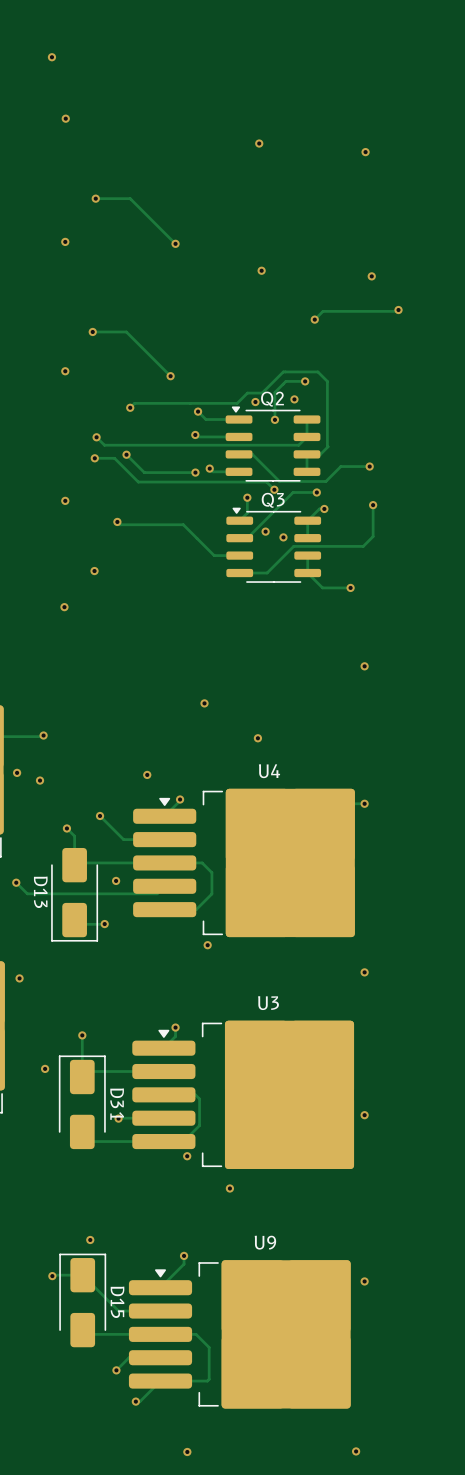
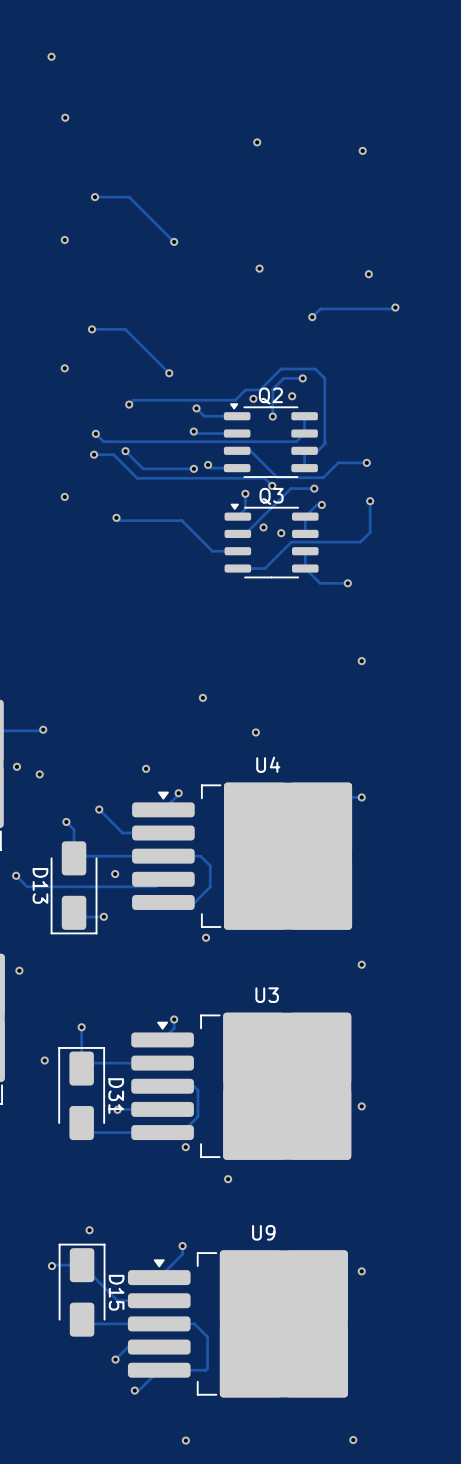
via: (94, 571) -> none
via: (64, 607) -> none

